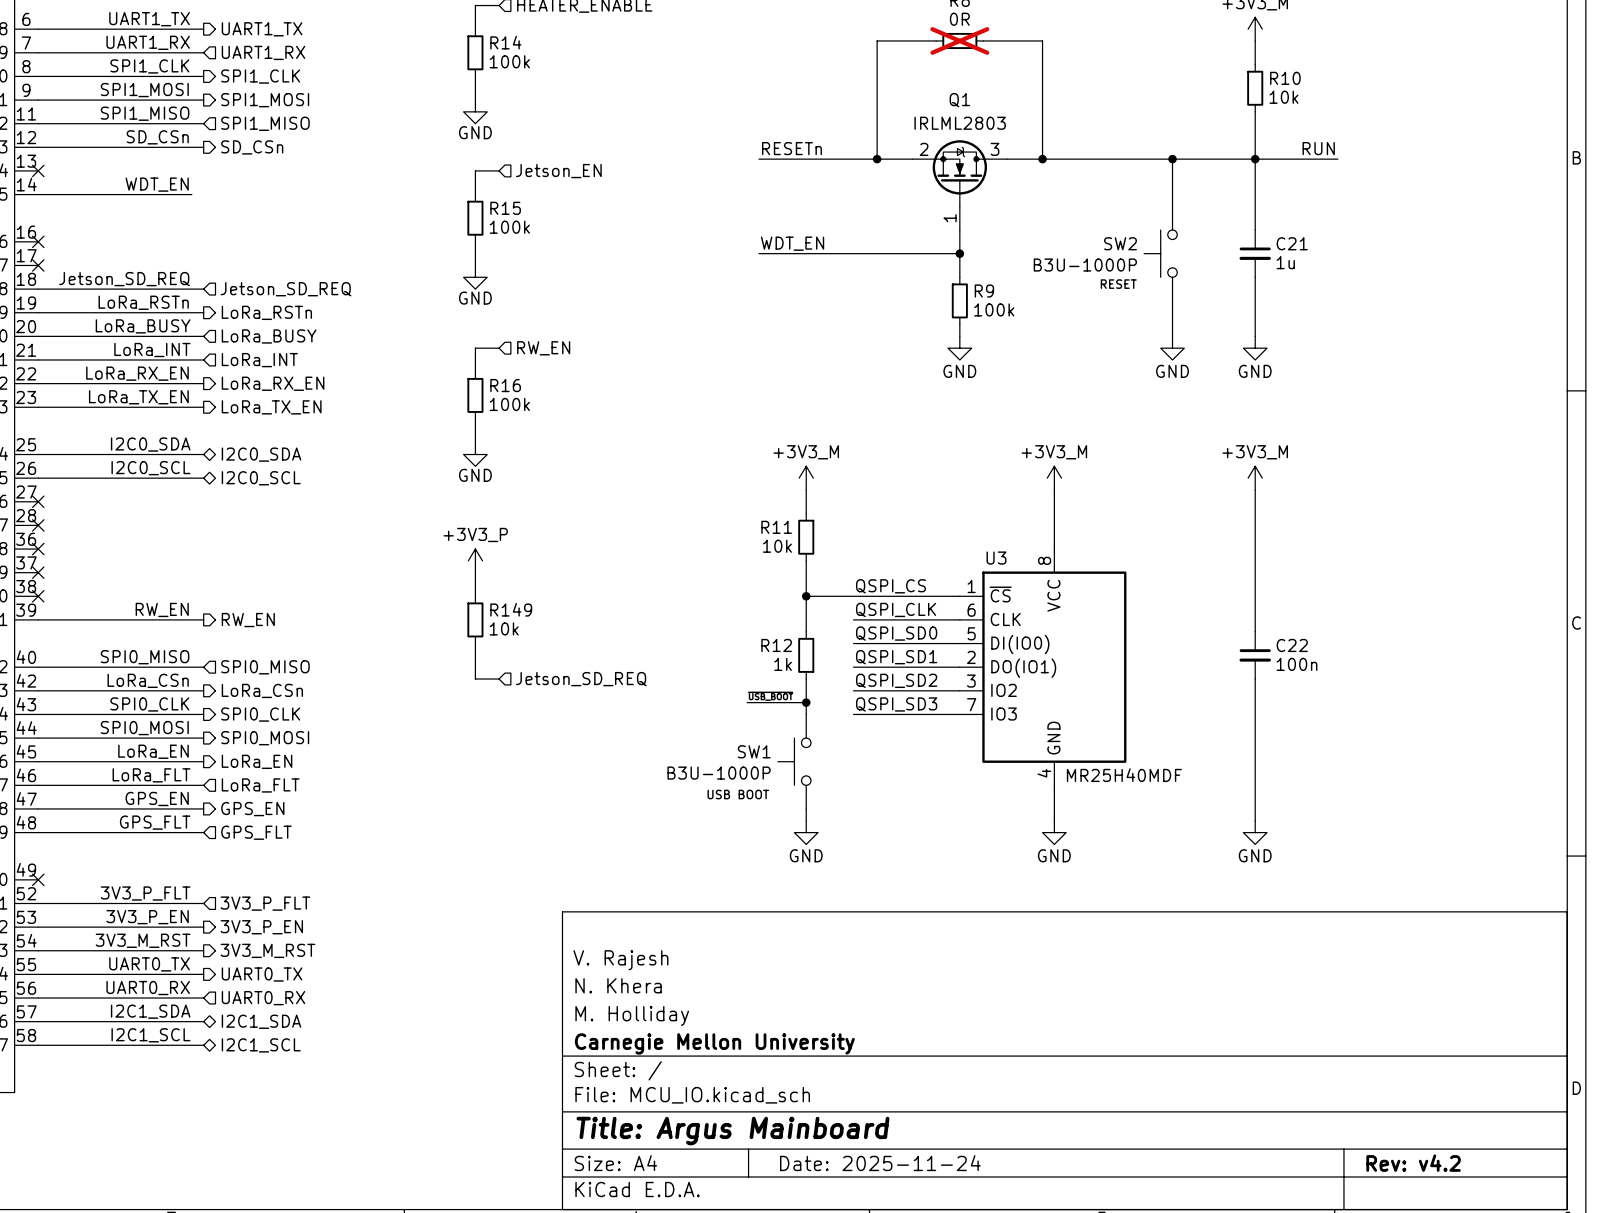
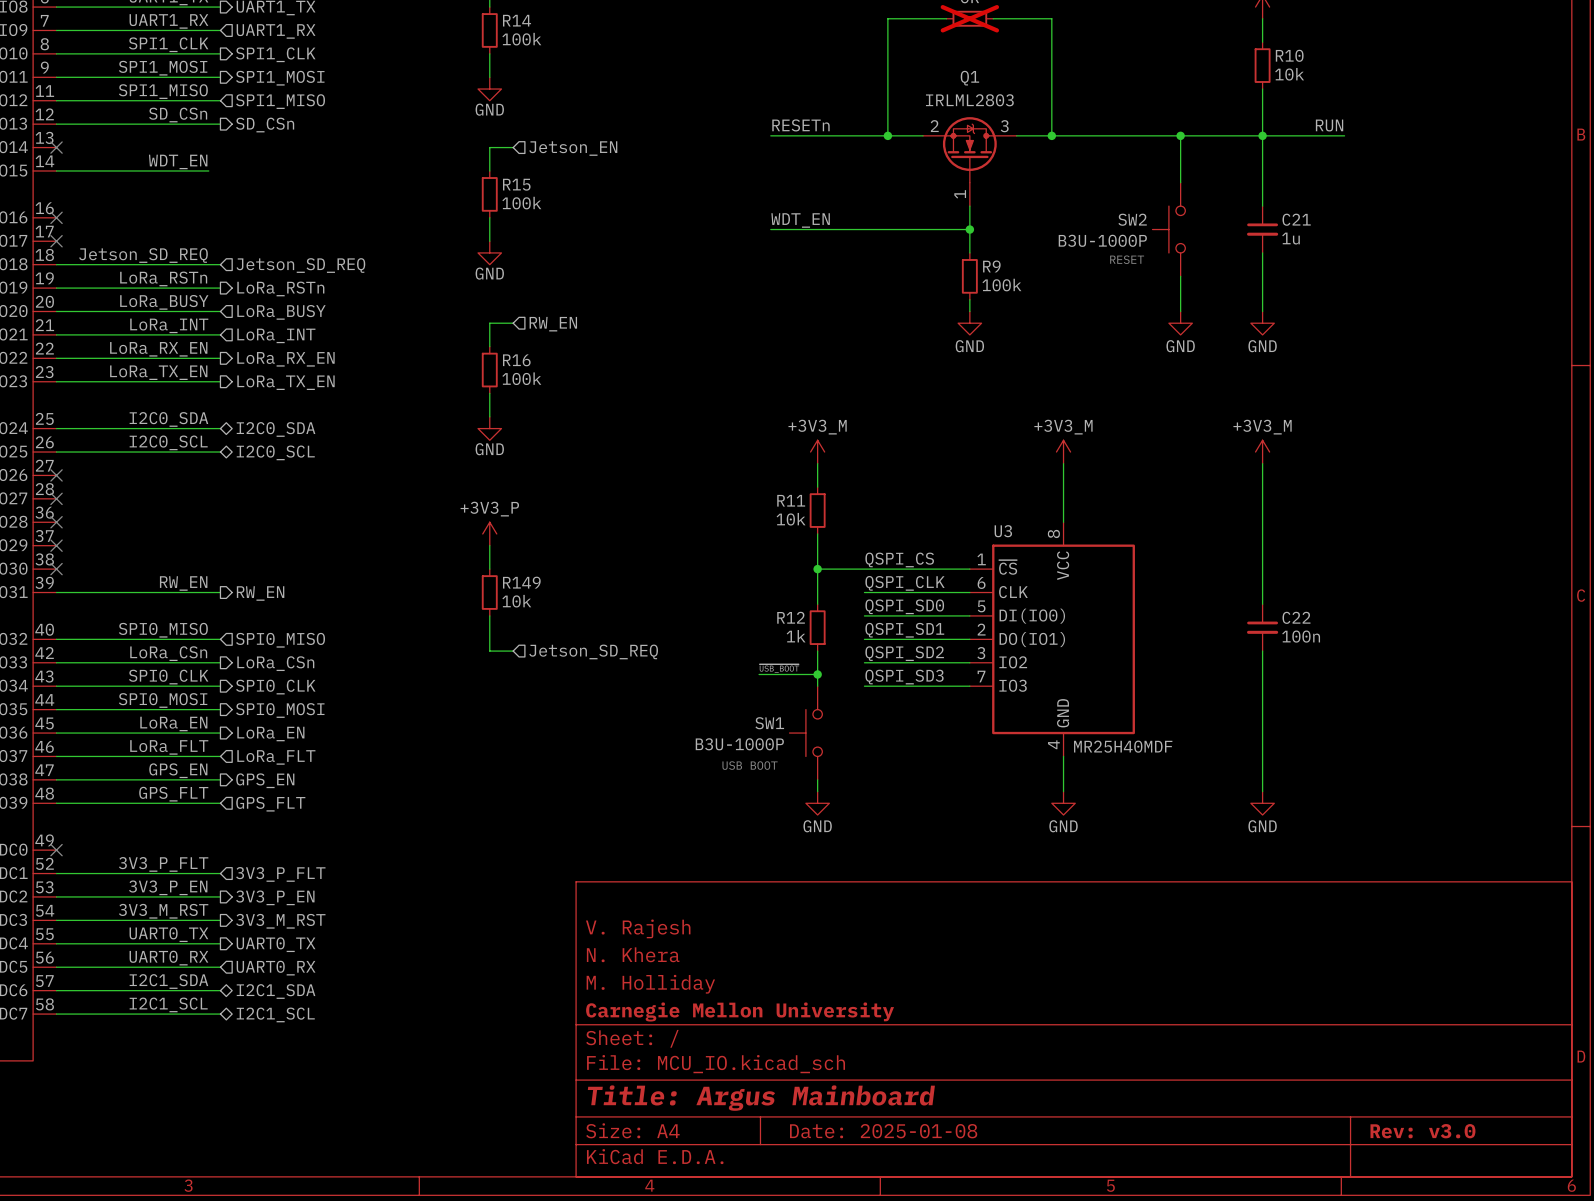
title block: Date: 2025-11-24 (880, 1163) -> Date: 2025-01-08 (883, 1131)
title block: Rev: v4.2 (1413, 1163) -> Rev: v3.0 (1422, 1131)

